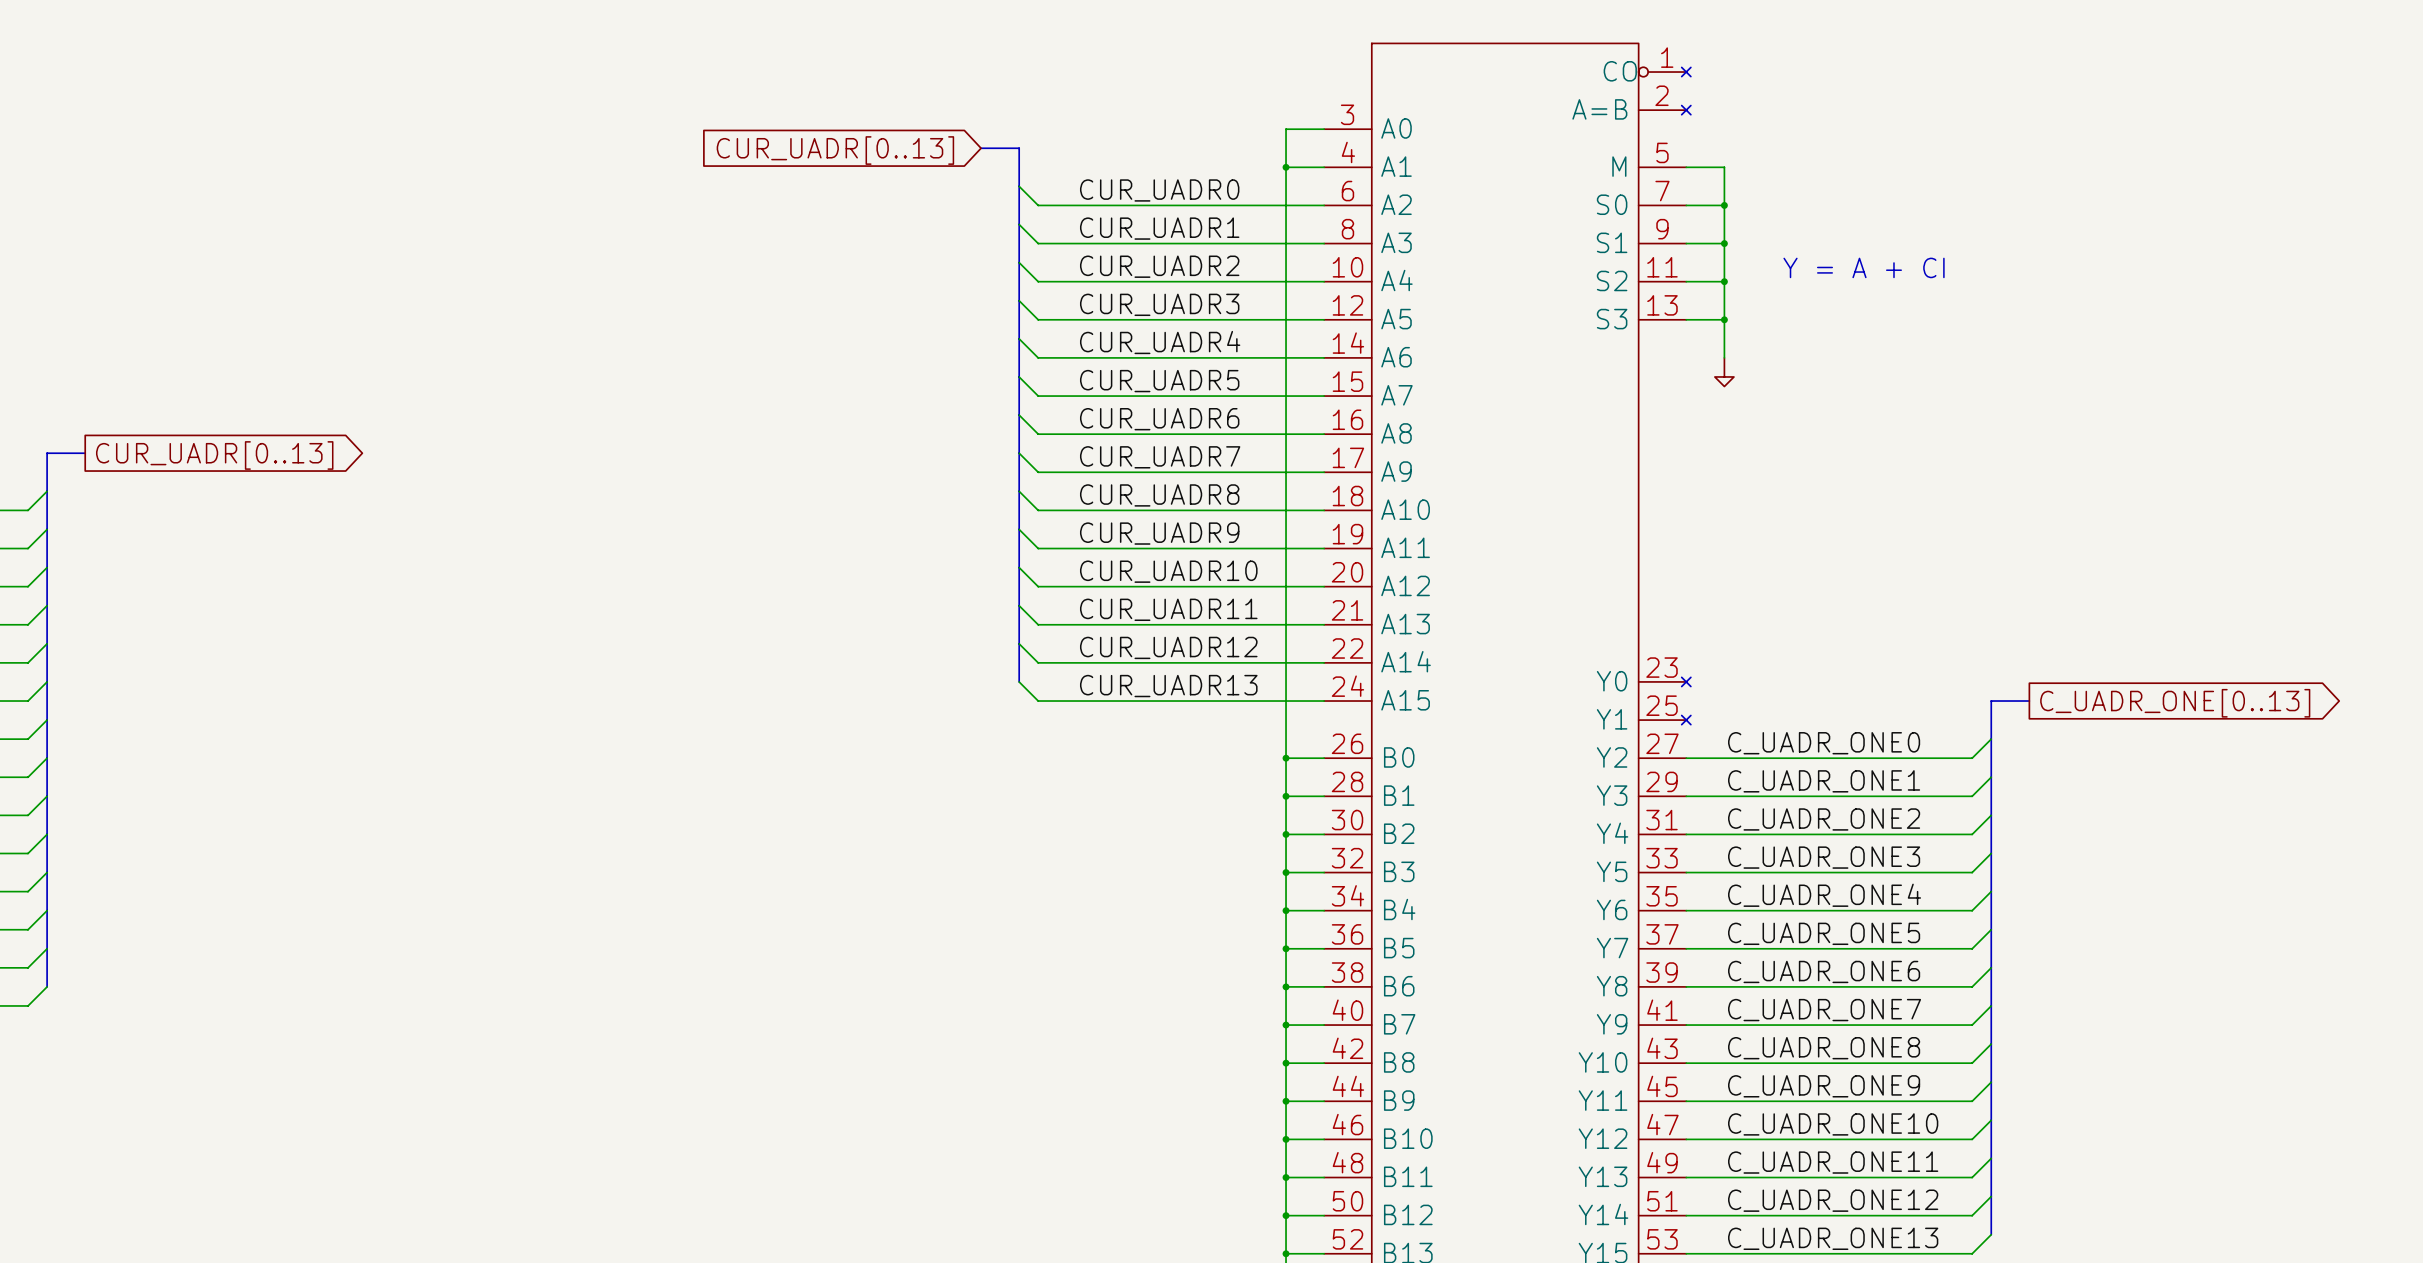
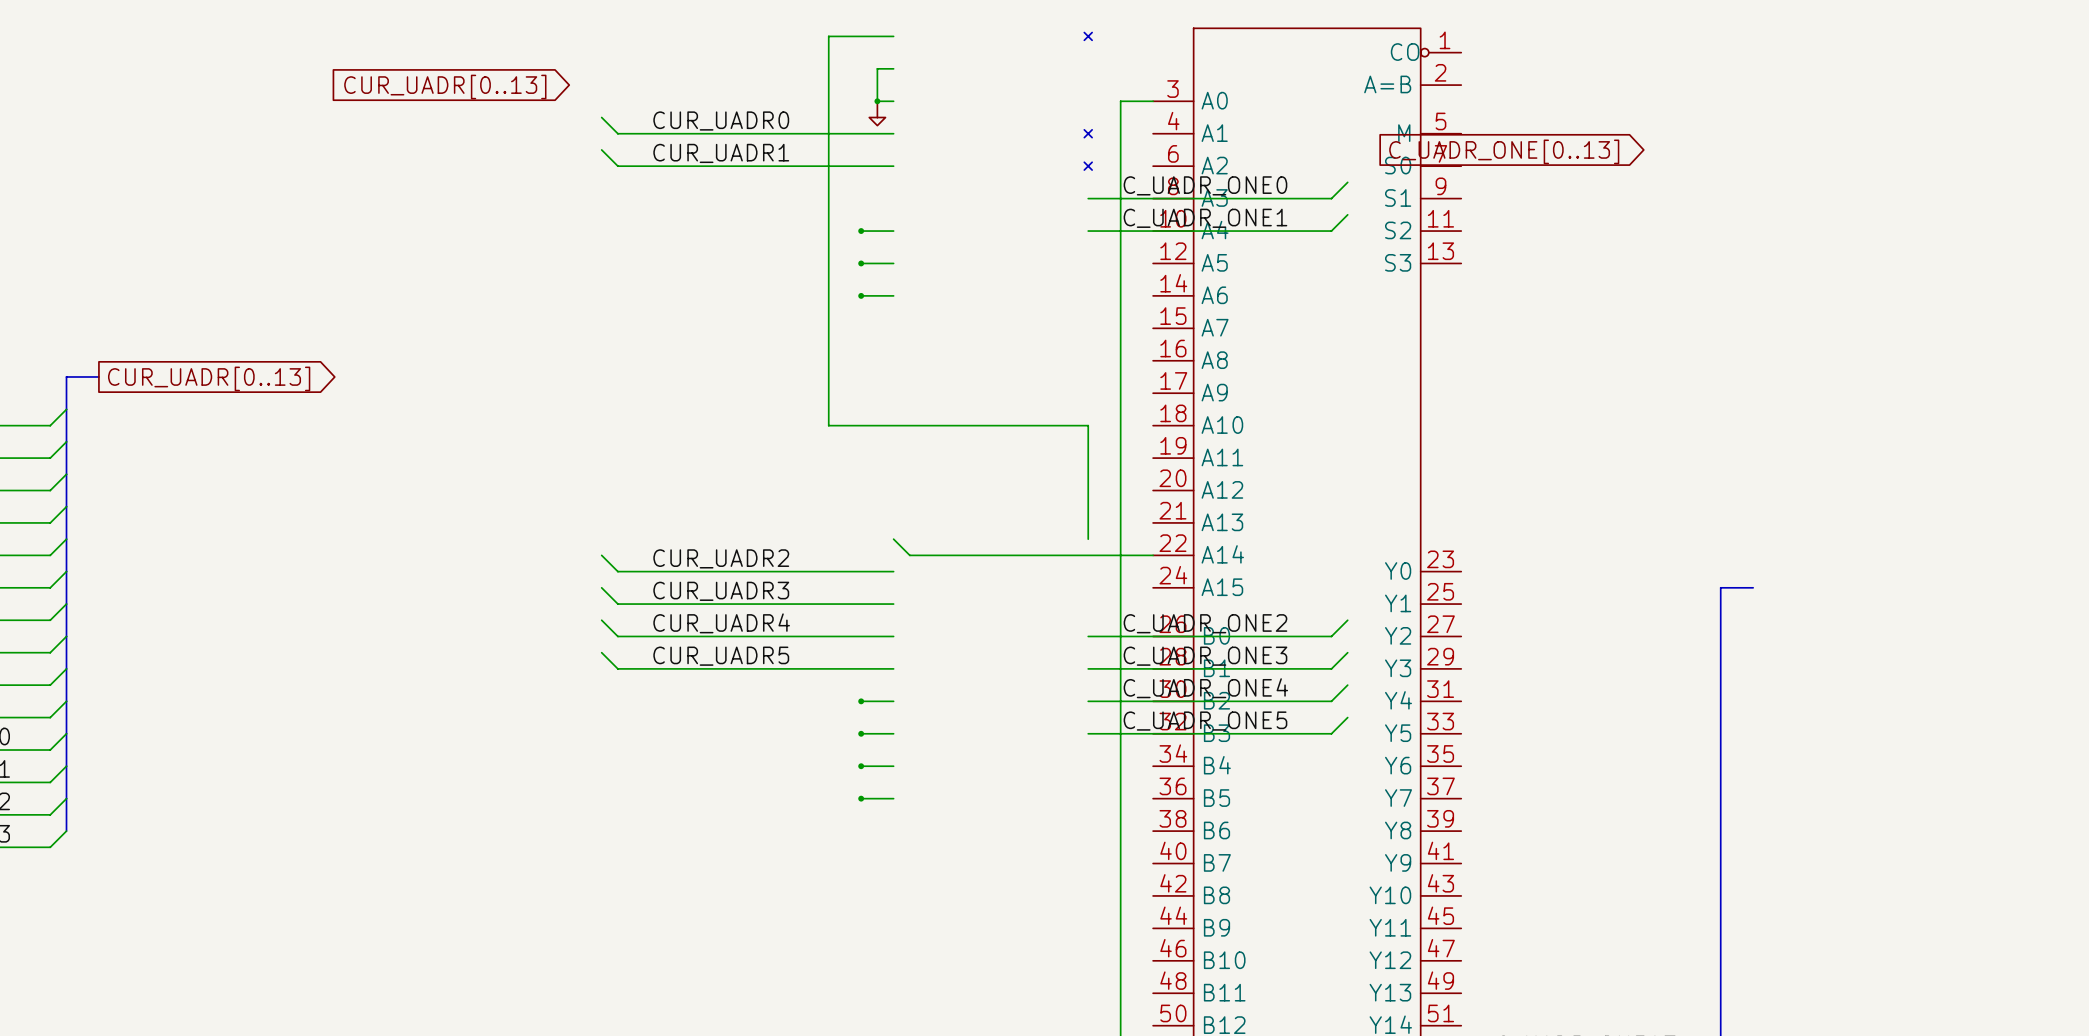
no-connect mark: none -> (1088, 36)
no-connect mark: (1686, 72) -> none
wire: none -> (893, 68) (877, 68) (877, 101) (893, 101)
no-connect mark: (1686, 110) -> none
global label: none -> CUR_UADR[0..13] (445, 87)
junction: none -> (877, 101)
power symbol: none -> (877, 113)
wire: none -> (601, 117) (617, 133) (893, 133)
bus: (981, 148) (1019, 148) (1019, 681) -> none
global label: CUR_UADR[0..13] (835, 150) -> none
label: none -> CUR_UADR0 (721, 120)
no-connect mark: none -> (1088, 133)
wire: (1286, 167) (1324, 167) -> none
junction: (1286, 167) -> none
wire: (1686, 167) (1724, 167) (1724, 357) -> none
wire: none -> (601, 149) (617, 166) (893, 166)
wire: (1019, 186) (1038, 205) (1324, 205) -> none
global label: none -> C_UADR_ONE[0..13] (1504, 151)
label: none -> CUR_UADR1 (721, 153)
label: CUR_UADR0 (1159, 190) -> none
no-connect mark: none -> (1088, 166)
wire: (1686, 205) (1724, 205) -> none
junction: (1724, 205) -> none
wire: (1019, 224) (1038, 243) (1247, 243) -> none
wire: none -> (1347, 182) (1331, 198) (1153, 198)
label: CUR_UADR1 (1159, 228) -> none
label: none -> C_UADR_ONE0 (1205, 185)
wire: (1686, 243) (1724, 243) -> none
junction: (1724, 243) -> none
wire: (1019, 262) (1038, 281) (1247, 281) -> none
wire: none -> (1347, 214) (1331, 231) (1153, 231)
label: CUR_UADR2 (1159, 266) -> none
label: none -> C_UADR_ONE1 (1205, 218)
text: Y = A + CI (1864, 267) -> none
wire: none -> (861, 231) (893, 231)
junction: none -> (861, 231)
wire: (1686, 281) (1724, 281) -> none
junction: (1724, 281) -> none
wire: (1019, 300) (1038, 319) (1324, 319) -> none
label: CUR_UADR3 (1159, 304) -> none
wire: none -> (861, 263) (893, 263)
junction: none -> (861, 263)
wire: (1686, 319) (1724, 319) -> none
junction: (1724, 319) -> none
wire: (1019, 338) (1038, 357) (1324, 357) -> none
label: CUR_UADR4 (1160, 342) -> none
wire: none -> (861, 295) (893, 295)
junction: none -> (861, 295)
power symbol: (1724, 372) -> none
wire: (1019, 376) (1038, 396) (1324, 396) -> none
label: CUR_UADR5 (1159, 381) -> none
wire: (1019, 415) (1038, 434) (1324, 434) -> none
label: CUR_UADR6 (1159, 419) -> none
wire: (1019, 453) (1038, 472) (1324, 472) -> none
label: CUR_UADR7 (1160, 457) -> none
wire: (1019, 491) (1038, 510) -> (893, 36) (828, 36) (828, 425) (909, 425)
label: CUR_UADR8 (1159, 495) -> none
wire: (1247, 510) (1324, 510) -> (1088, 425) (1088, 539)
wire: (1019, 529) (1038, 548) (1324, 548) -> none
label: CUR_UADR9 (1159, 533) -> none
wire: (1019, 567) (1038, 586) (1324, 586) -> none
label: CUR_UADR10 (1168, 571) -> none
wire: (1019, 605) (1038, 624) (1324, 624) -> none
label: CUR_UADR11 (1168, 609) -> none
label: CUR_UADR12 (1168, 647) -> none
label: none -> CUR_UADR2 (721, 558)
wire: (1019, 681) (1038, 701) (1324, 701) -> (893, 571) (617, 571) (601, 555)
no-connect mark: (1686, 681) -> none
label: CUR_UADR13 (1168, 686) -> none
wire: none -> (601, 587) (617, 604) (893, 604)
global label: C_UADR_ONE[0..13] (2175, 703) -> none
label: none -> CUR_UADR3 (721, 591)
no-connect mark: (1686, 720) -> none
wire: none -> (601, 620) (617, 636) (893, 636)
wire: none -> (1347, 620) (1331, 636) (1153, 636)
wire: (1991, 739) (1972, 758) (1686, 758) -> none
label: none -> CUR_UADR4 (721, 623)
label: none -> C_UADR_ONE2 (1205, 623)
label: C_UADR_ONE0 (1824, 743) -> none
junction: (1286, 758) -> none
wire: none -> (601, 652) (617, 668) (893, 668)
wire: none -> (1347, 652) (1331, 668) (1153, 668)
wire: (1991, 777) (1972, 796) (1686, 796) -> none
label: none -> CUR_UADR5 (721, 656)
label: none -> C_UADR_ONE3 (1205, 656)
label: C_UADR_ONE1 (1824, 781) -> none
junction: (1286, 796) -> none
wire: none -> (1347, 685) (1331, 701) (1153, 701)
wire: (1991, 815) (1972, 834) (1686, 834) -> none
label: none -> C_UADR_ONE4 (1205, 688)
label: C_UADR_ONE2 (1824, 819) -> none
wire: none -> (861, 701) (893, 701)
junction: none -> (861, 701)
junction: (1286, 834) -> none
wire: none -> (1347, 717) (1331, 733) (1153, 733)
wire: (1991, 853) (1972, 872) (1686, 872) -> none
label: none -> C_UADR_ONE5 (1205, 721)
label: C_UADR_ONE3 (1824, 857) -> none
wire: none -> (861, 733) (893, 733)
junction: none -> (861, 733)
junction: (1286, 872) -> none
wire: (1991, 891) (1972, 910) (1686, 910) -> none
label: C_UADR_ONE4 (1824, 895) -> none
wire: none -> (861, 766) (893, 766)
junction: none -> (861, 766)
wire: (1286, 910) (1324, 910) -> (1088, 636) (1120, 636)
junction: (1286, 910) -> none
wire: (1991, 929) (1972, 948) (1686, 948) -> none
label: C_UADR_ONE5 (1824, 933) -> none
wire: none -> (861, 798) (893, 798)
junction: none -> (861, 798)
wire: (1286, 948) (1324, 948) -> (1088, 668) (1120, 668)
junction: (1286, 948) -> none
wire: (1991, 967) (1972, 986) (1686, 986) -> none
label: C_UADR_ONE6 (1824, 971) -> none
wire: (1286, 986) (1324, 986) -> (1088, 701) (1120, 701)
junction: (1286, 986) -> none
wire: (1991, 1005) (1972, 1025) (1686, 1025) -> none
label: C_UADR_ONE7 (1824, 1010) -> none
wire: (1286, 1025) (1324, 1025) -> (1088, 733) (1120, 733)
junction: (1286, 1025) -> none
wire: (1991, 1044) (1972, 1063) (1686, 1063) -> none
label: C_UADR_ONE8 (1824, 1048) -> none
wire: (1286, 1063) (1324, 1063) -> none
junction: (1286, 1063) -> none
wire: (1991, 1082) (1972, 1101) (1686, 1101) -> none
label: C_UADR_ONE9 (1824, 1086) -> none
wire: (1286, 1101) (1324, 1101) -> none
junction: (1286, 1101) -> none
wire: (1991, 1120) (1972, 1139) (1686, 1139) -> none
label: C_UADR_ONE10 (1833, 1124) -> none
wire: (1286, 1139) (1324, 1139) -> none
junction: (1286, 1139) -> none
wire: (1991, 1158) (1972, 1177) (1686, 1177) -> none
label: C_UADR_ONE11 (1833, 1162) -> none
wire: (1286, 1177) (1324, 1177) -> none
junction: (1286, 1177) -> none
wire: (1991, 1196) (1972, 1215) (1686, 1215) -> none
label: C_UADR_ONE12 (1833, 1200) -> none
wire: (1286, 1215) (1324, 1215) -> none
junction: (1286, 1215) -> none

